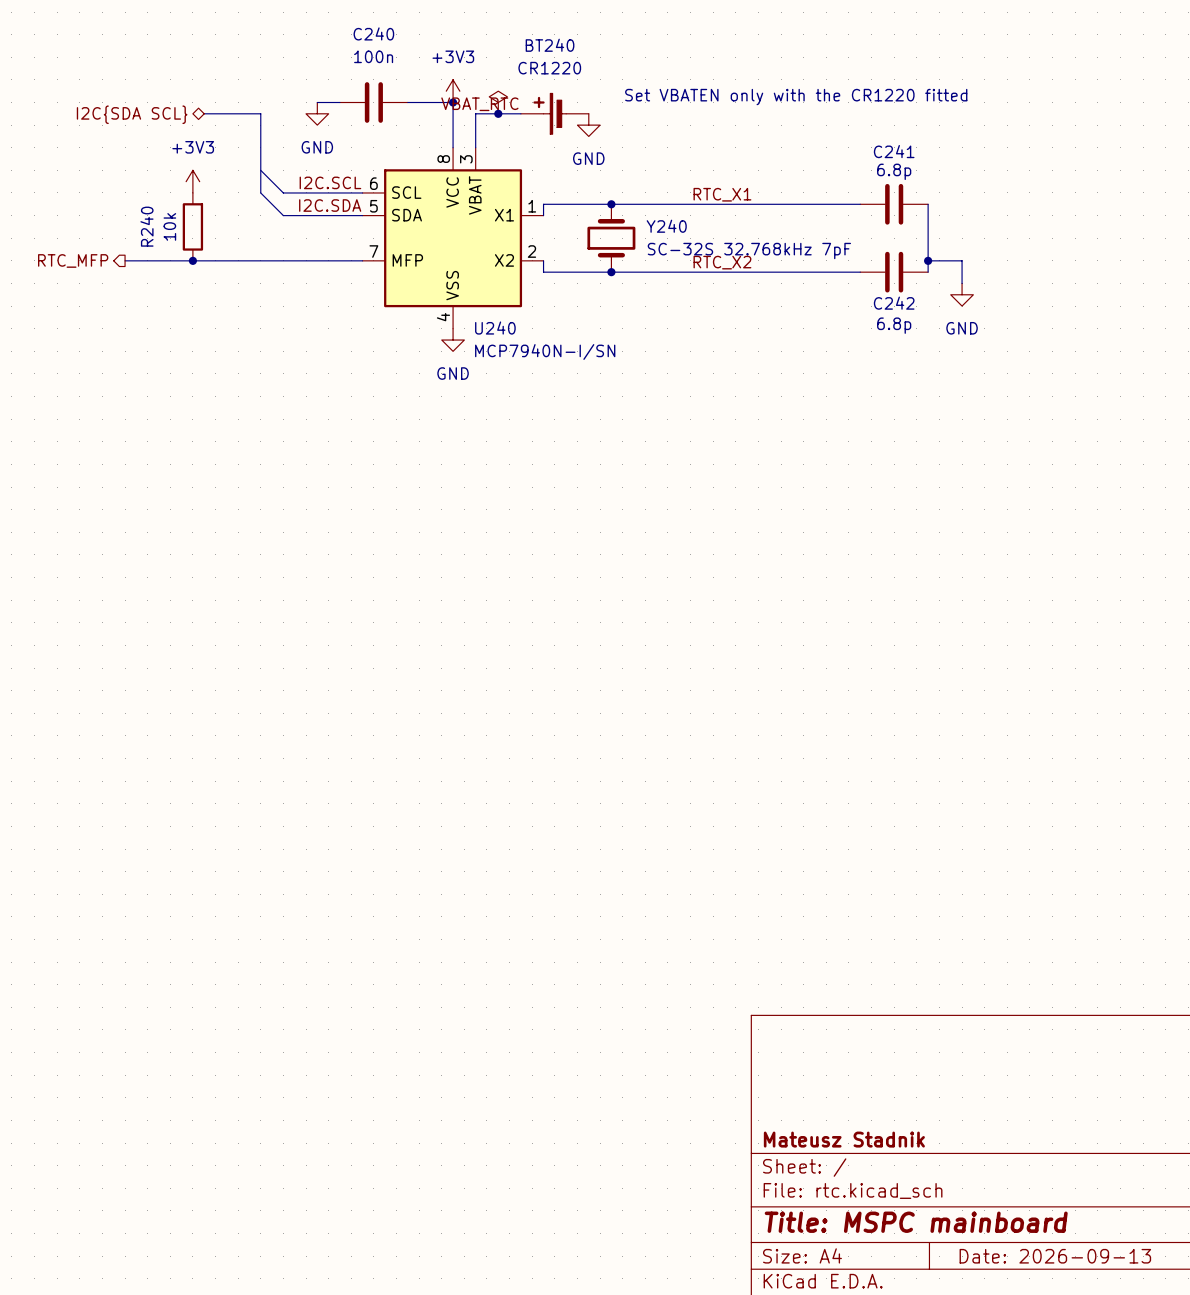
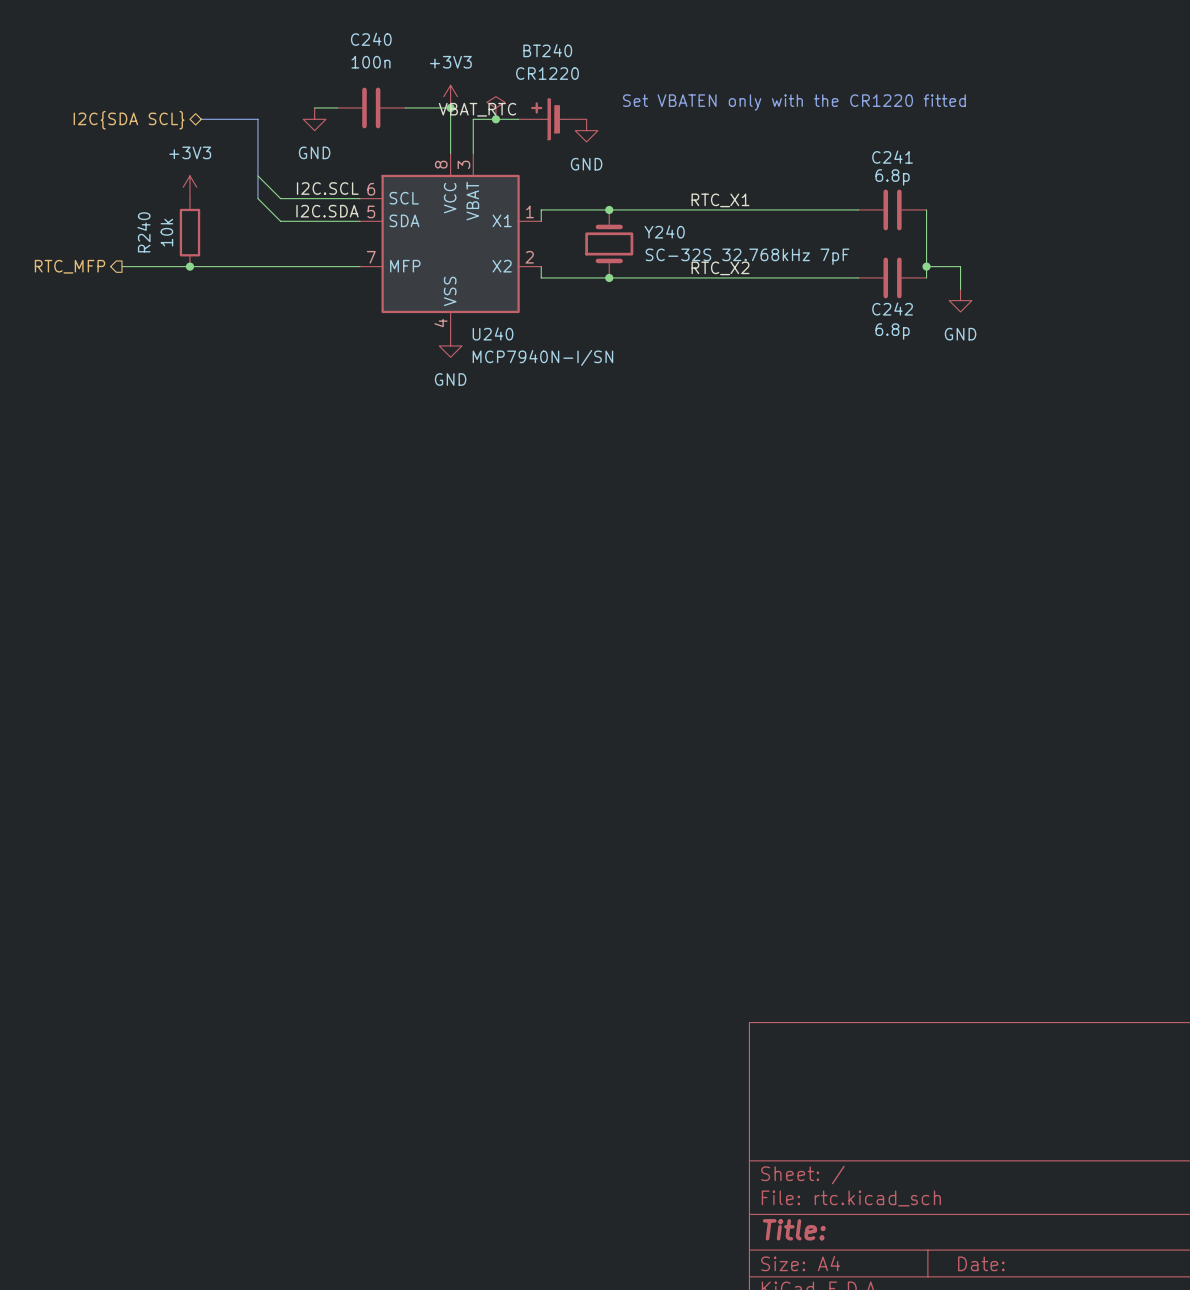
title block: Mateusz Stadnik (844, 1139) -> none
title block: Title: MSPC mainboard (916, 1222) -> Title: (794, 1229)
title block: Date: 2026-09-13 (1055, 1256) -> Date: (981, 1263)

